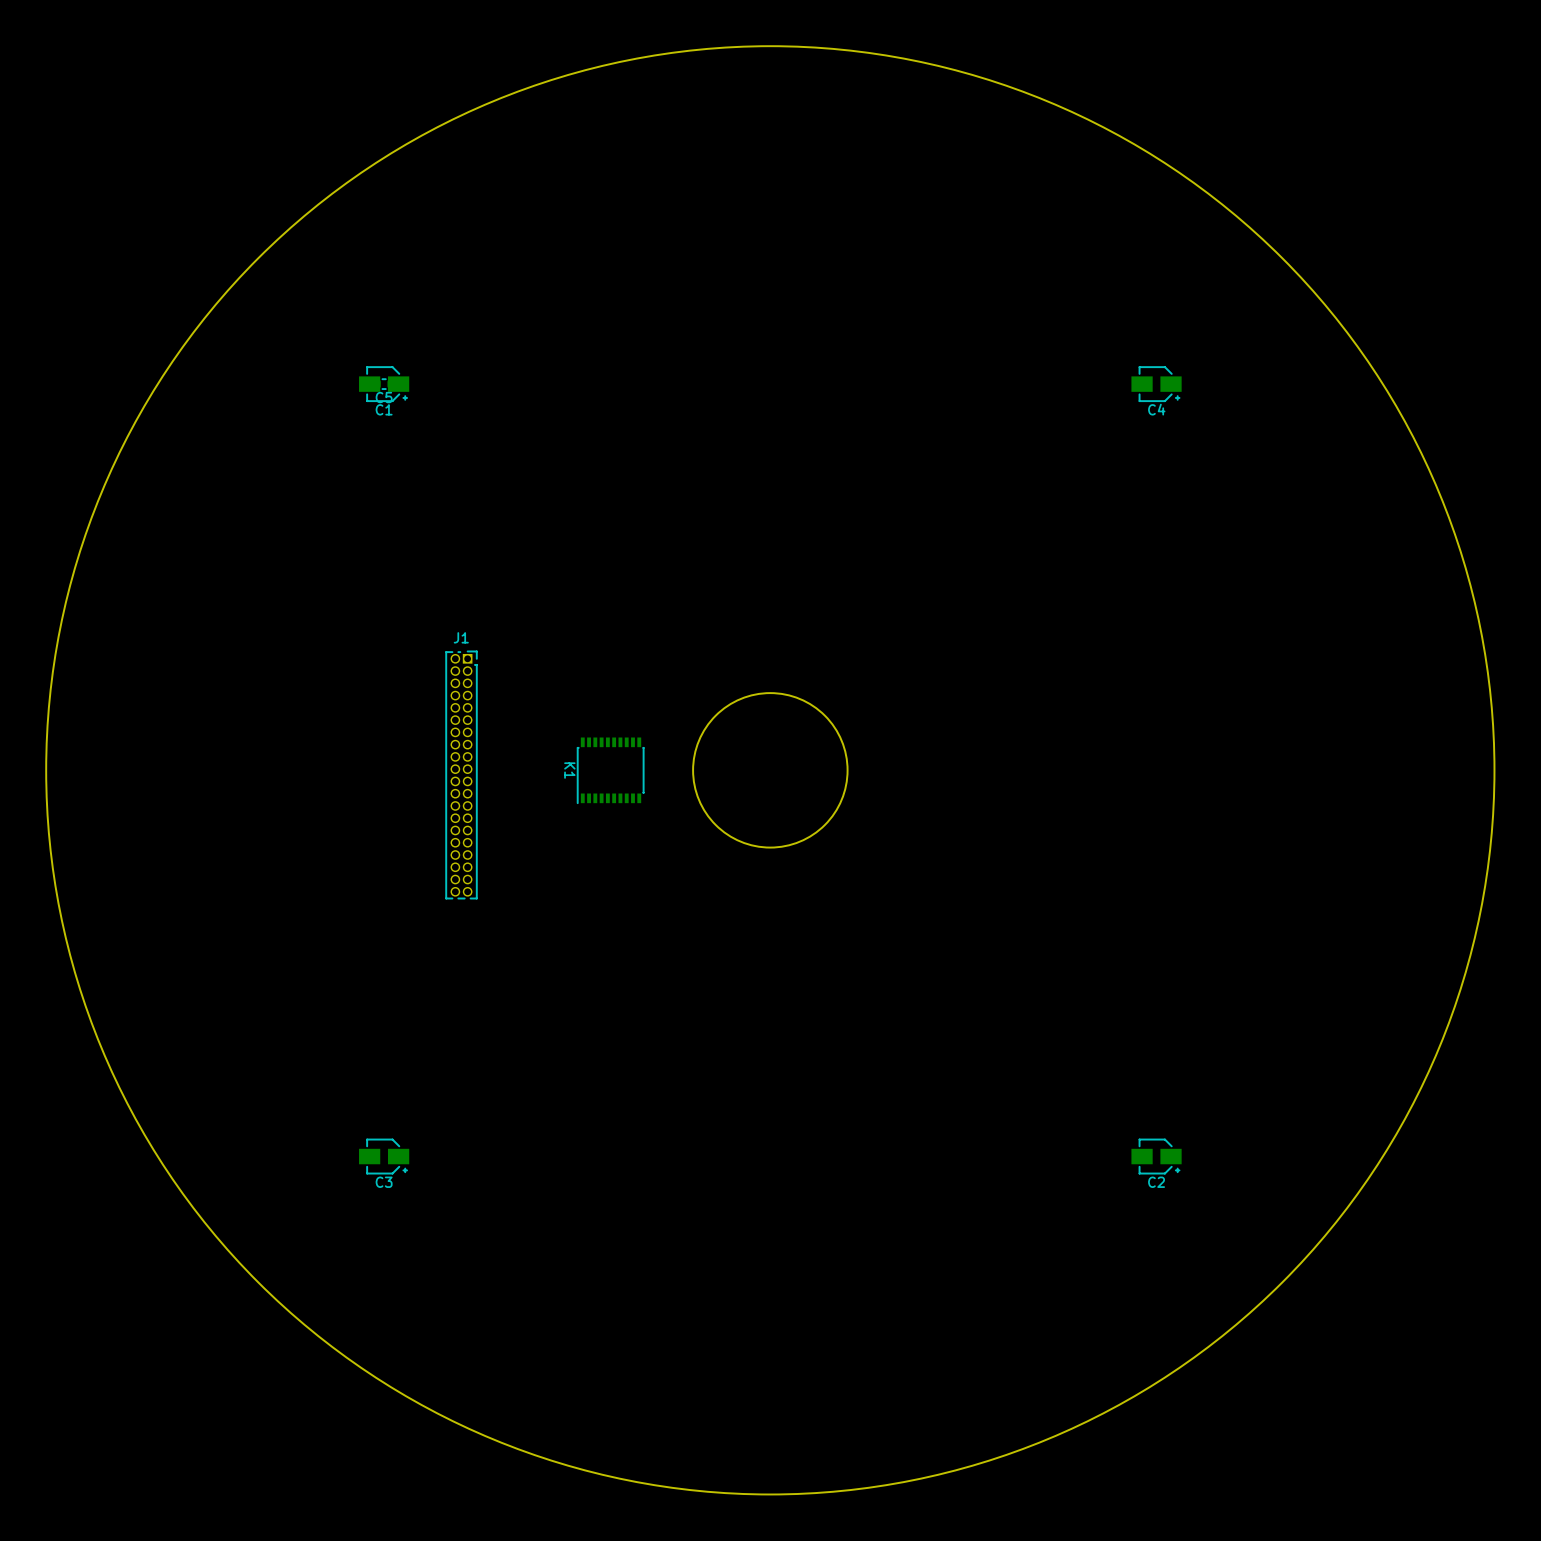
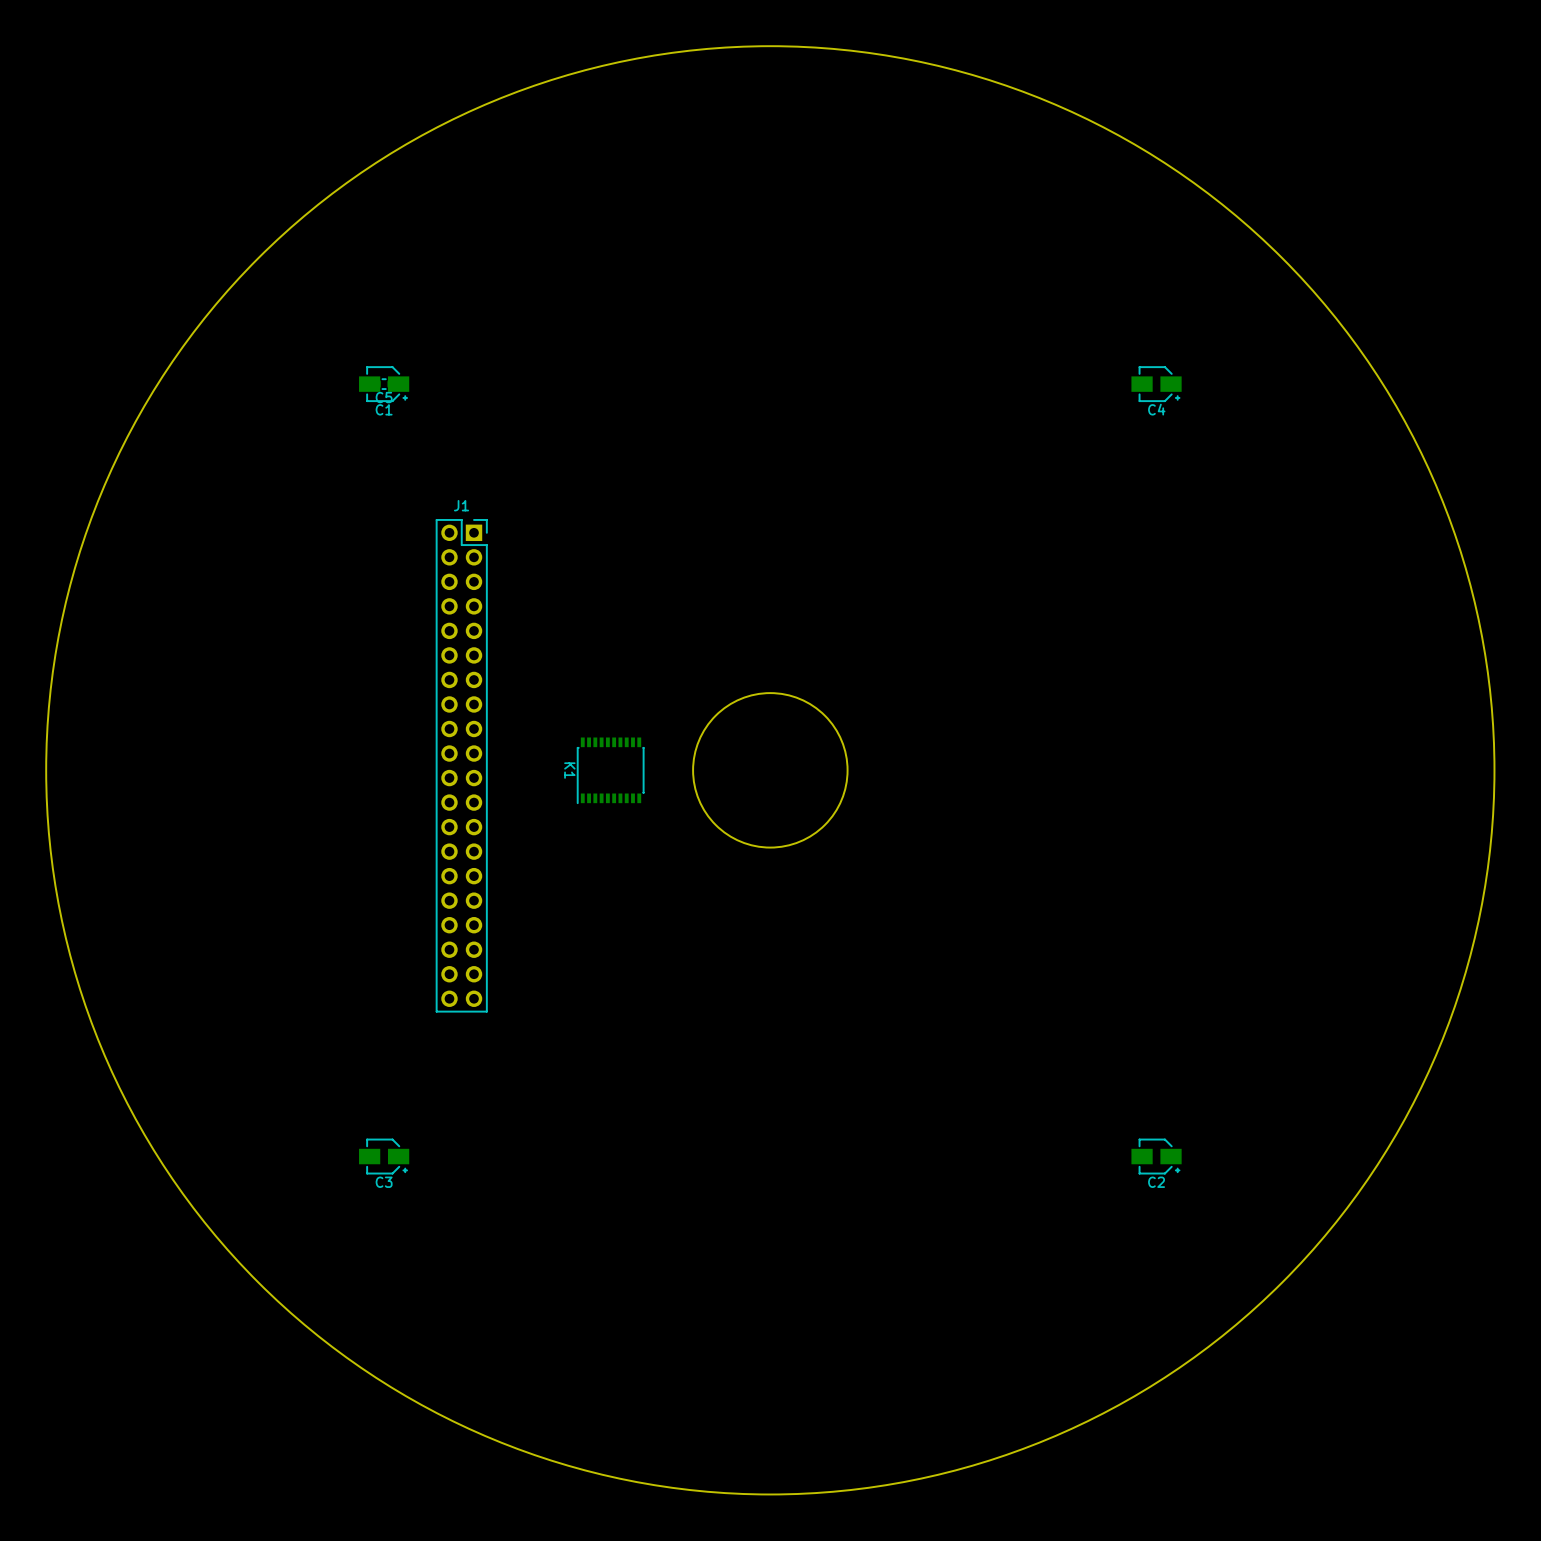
J1 name position: J1 (461, 637) -> J1 (461, 505)
J1 footprint: [445, 650, 478, 900] -> [436, 519, 488, 1013]

